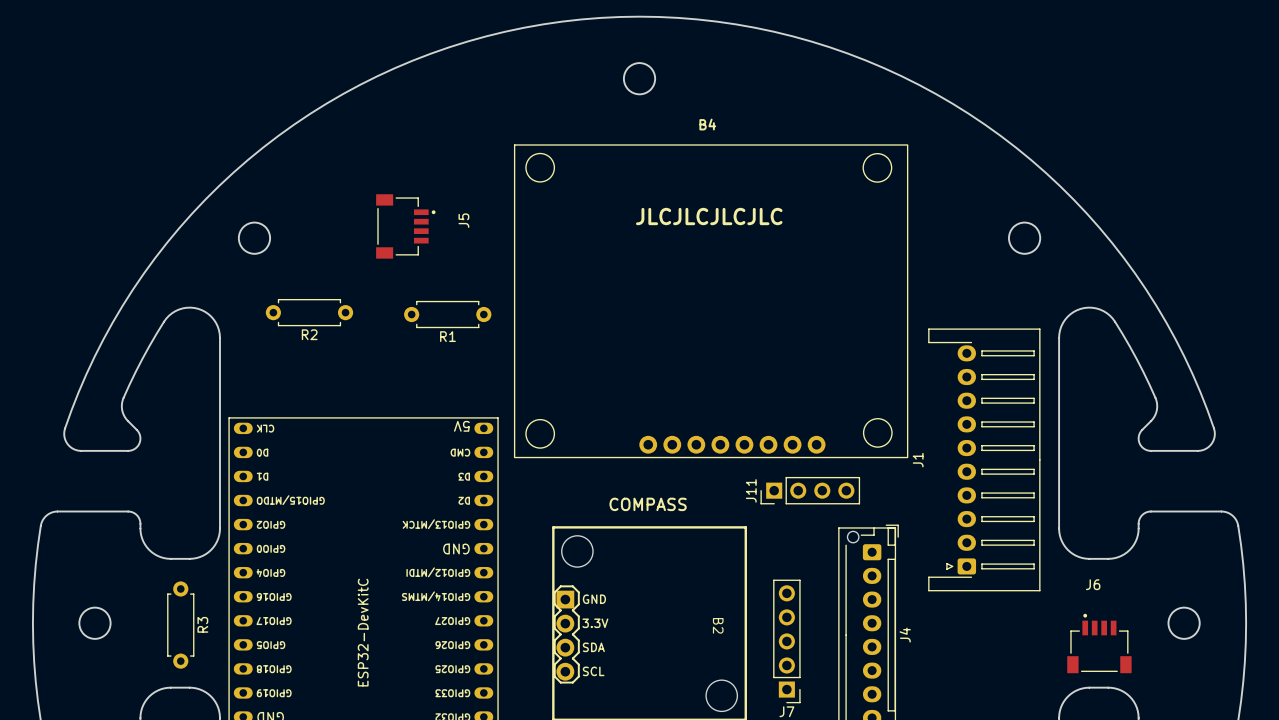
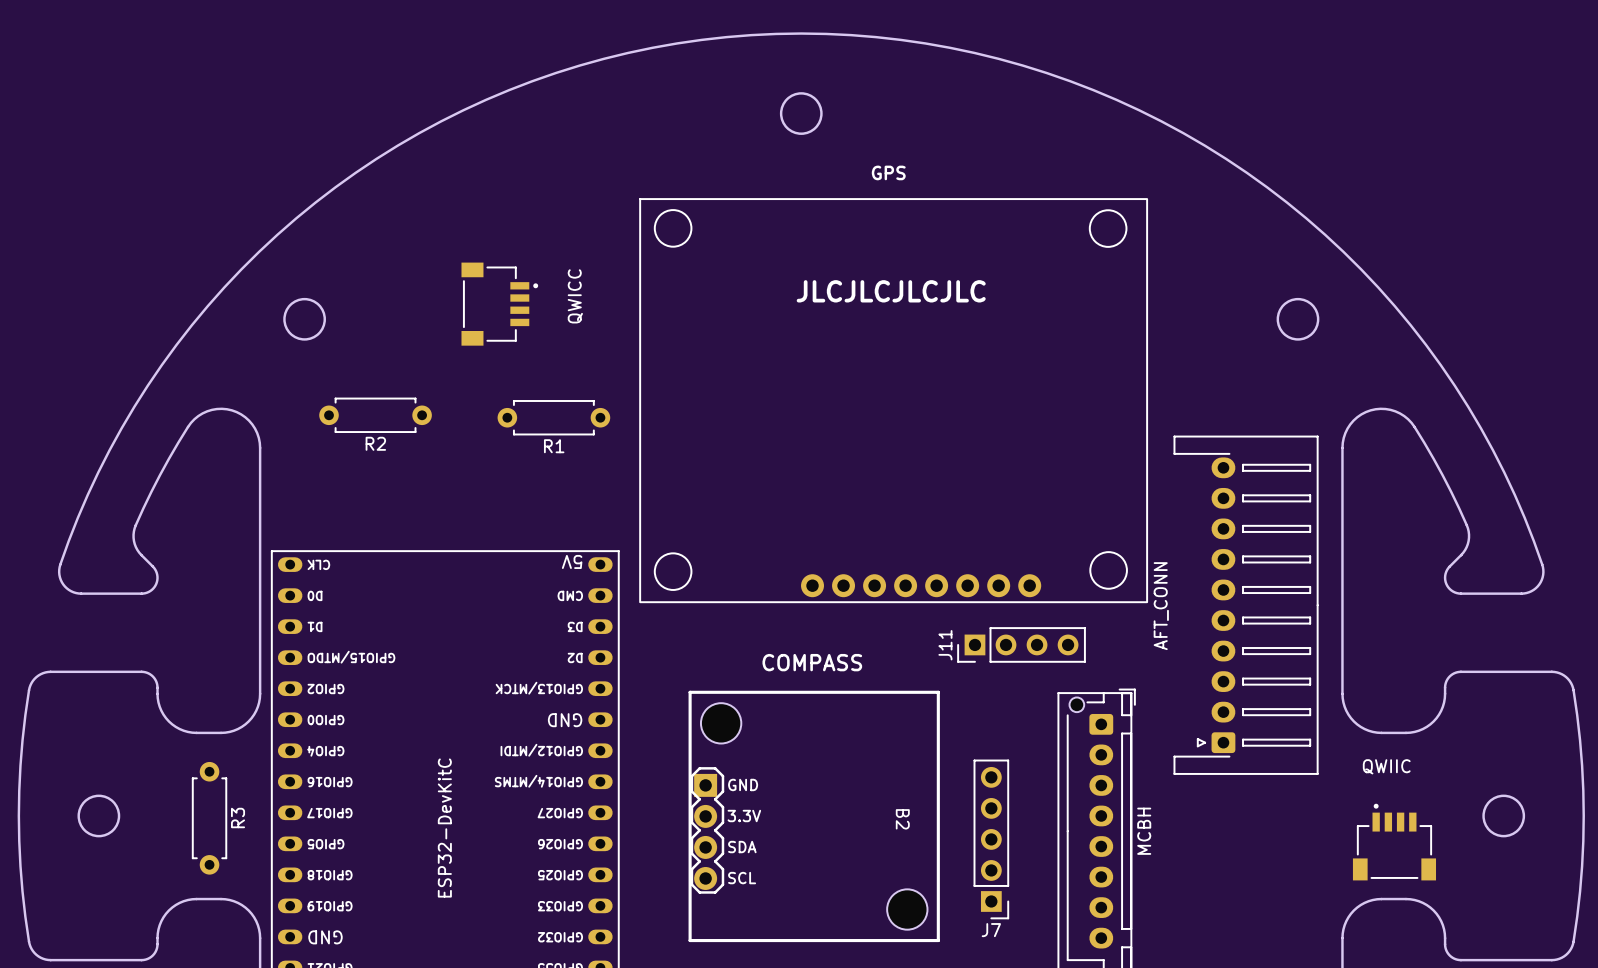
B4 name: B4 (707, 124) -> GPS (888, 172)
J5 name: J5 (463, 220) -> QWICC (575, 296)
J1 name: J1 (918, 460) -> AFT_CONN (1161, 606)
J6 name: J6 (1093, 584) -> QWIIC (1386, 766)
J4 name: J4 (905, 635) -> MCBH (1144, 831)

